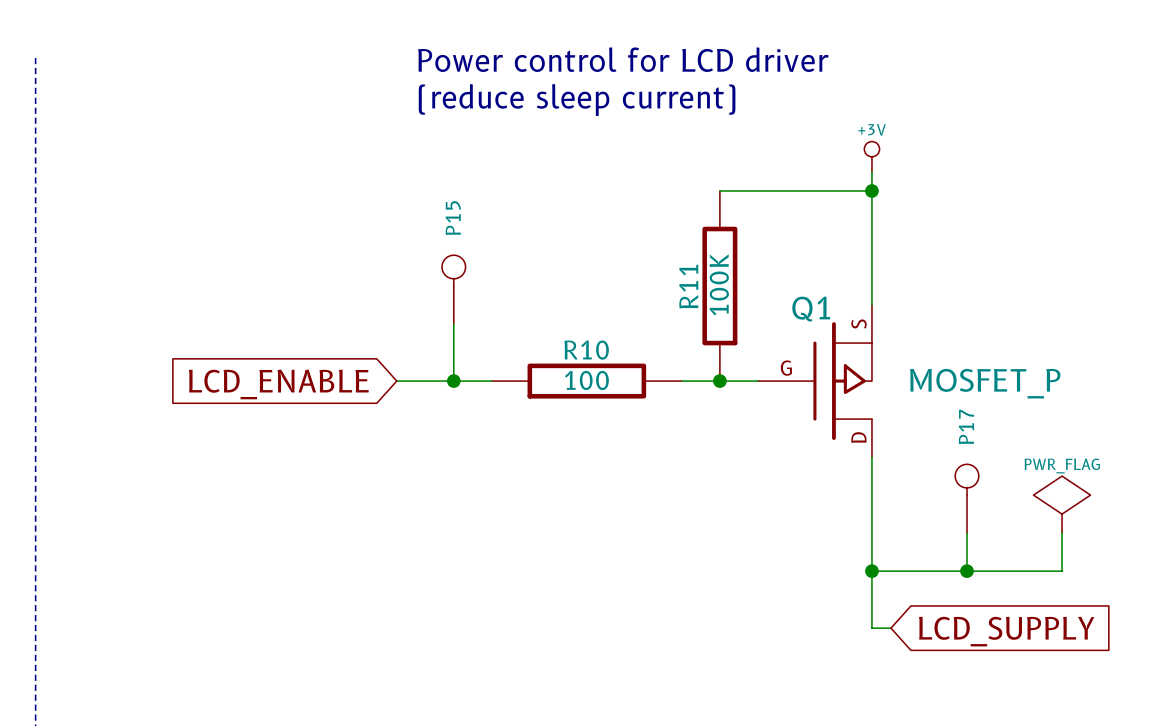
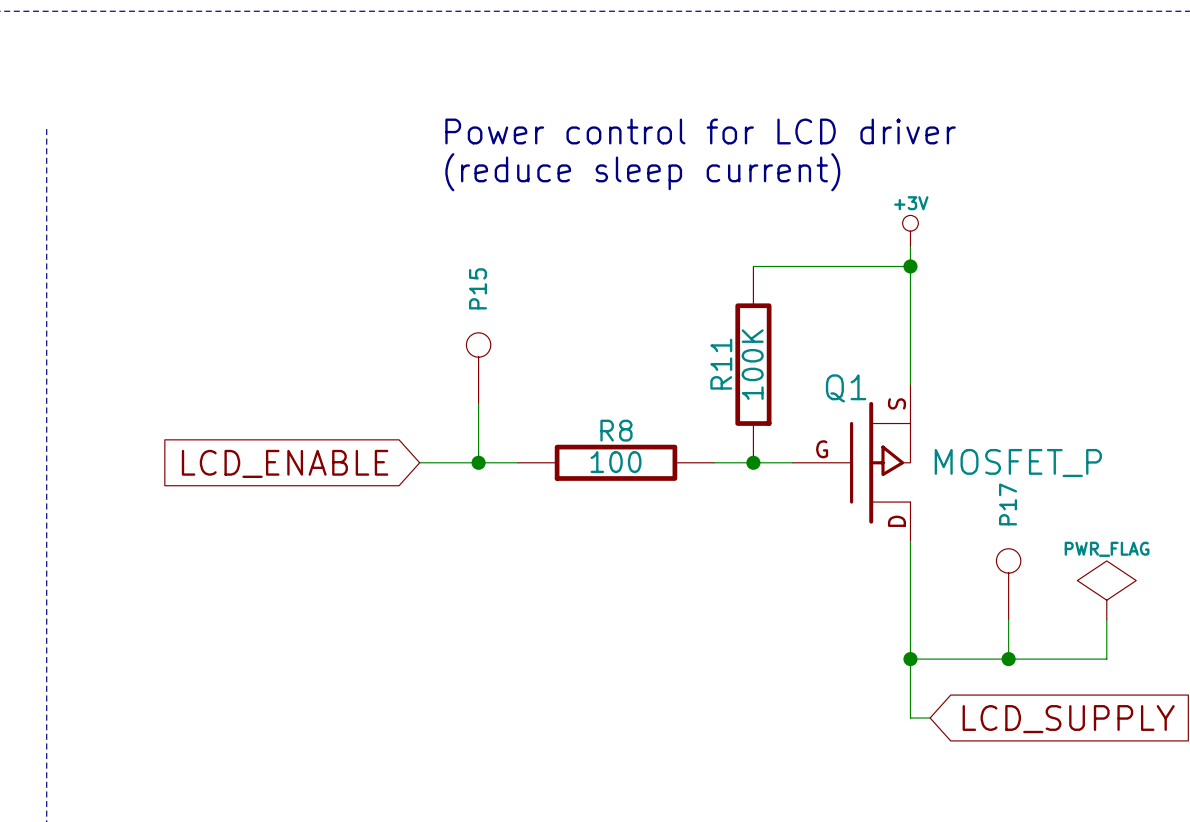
R10 name: R10 (586, 350) -> R8 (616, 430)

